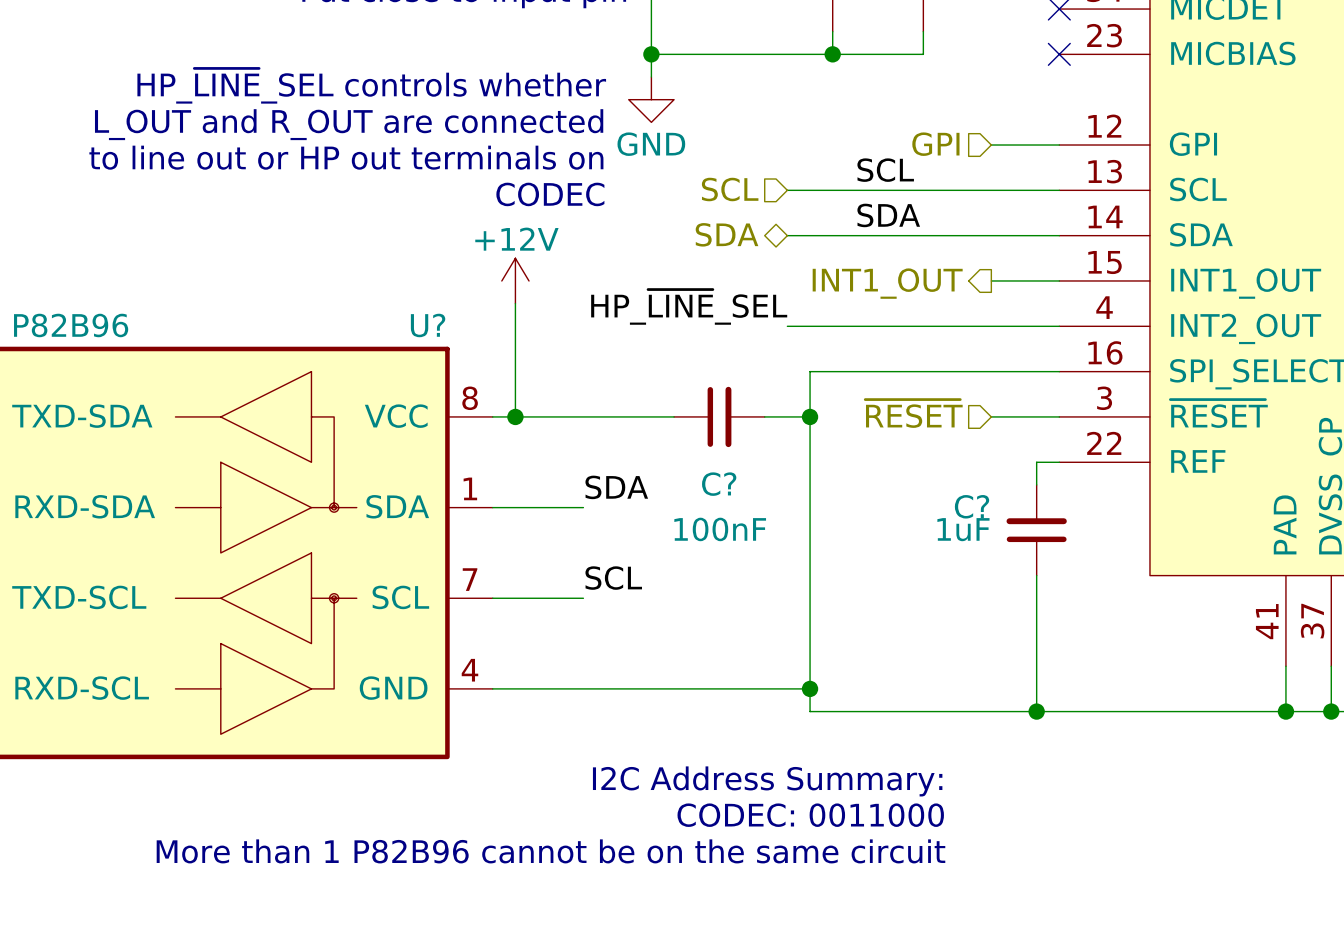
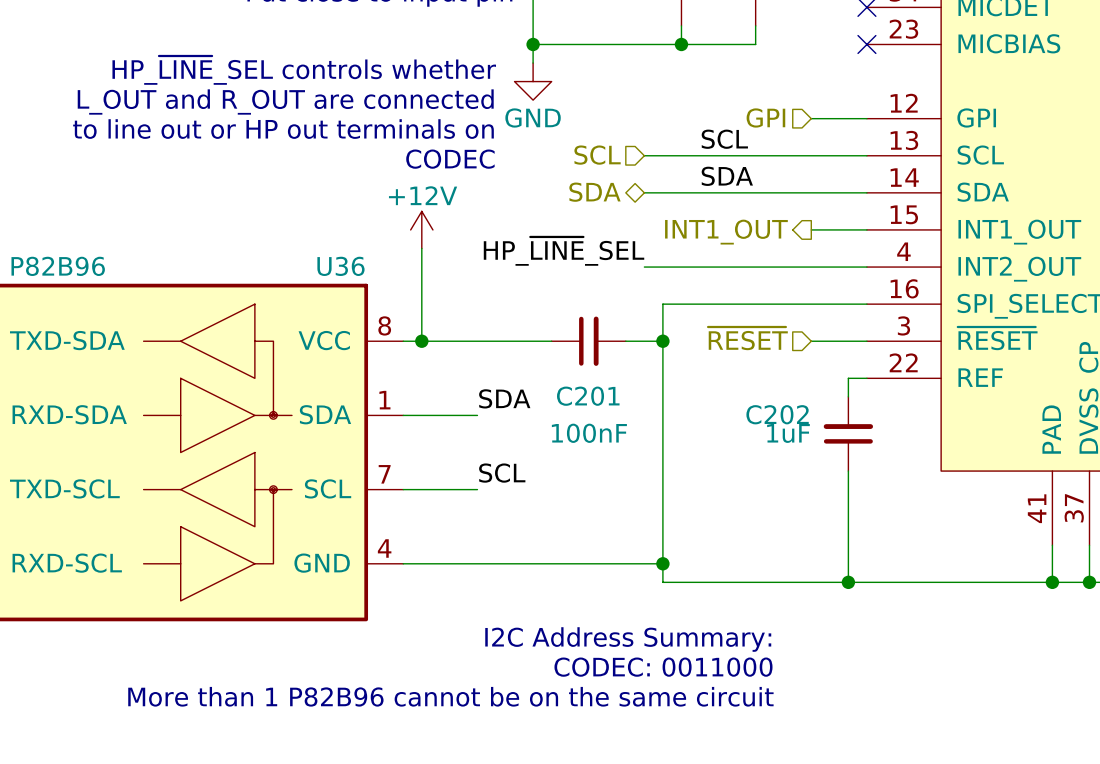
U? name: U? (428, 325) -> U36 (340, 266)
C? name: C? (719, 484) -> C201 (588, 396)
C? name: C? (972, 506) -> C202 (777, 414)

